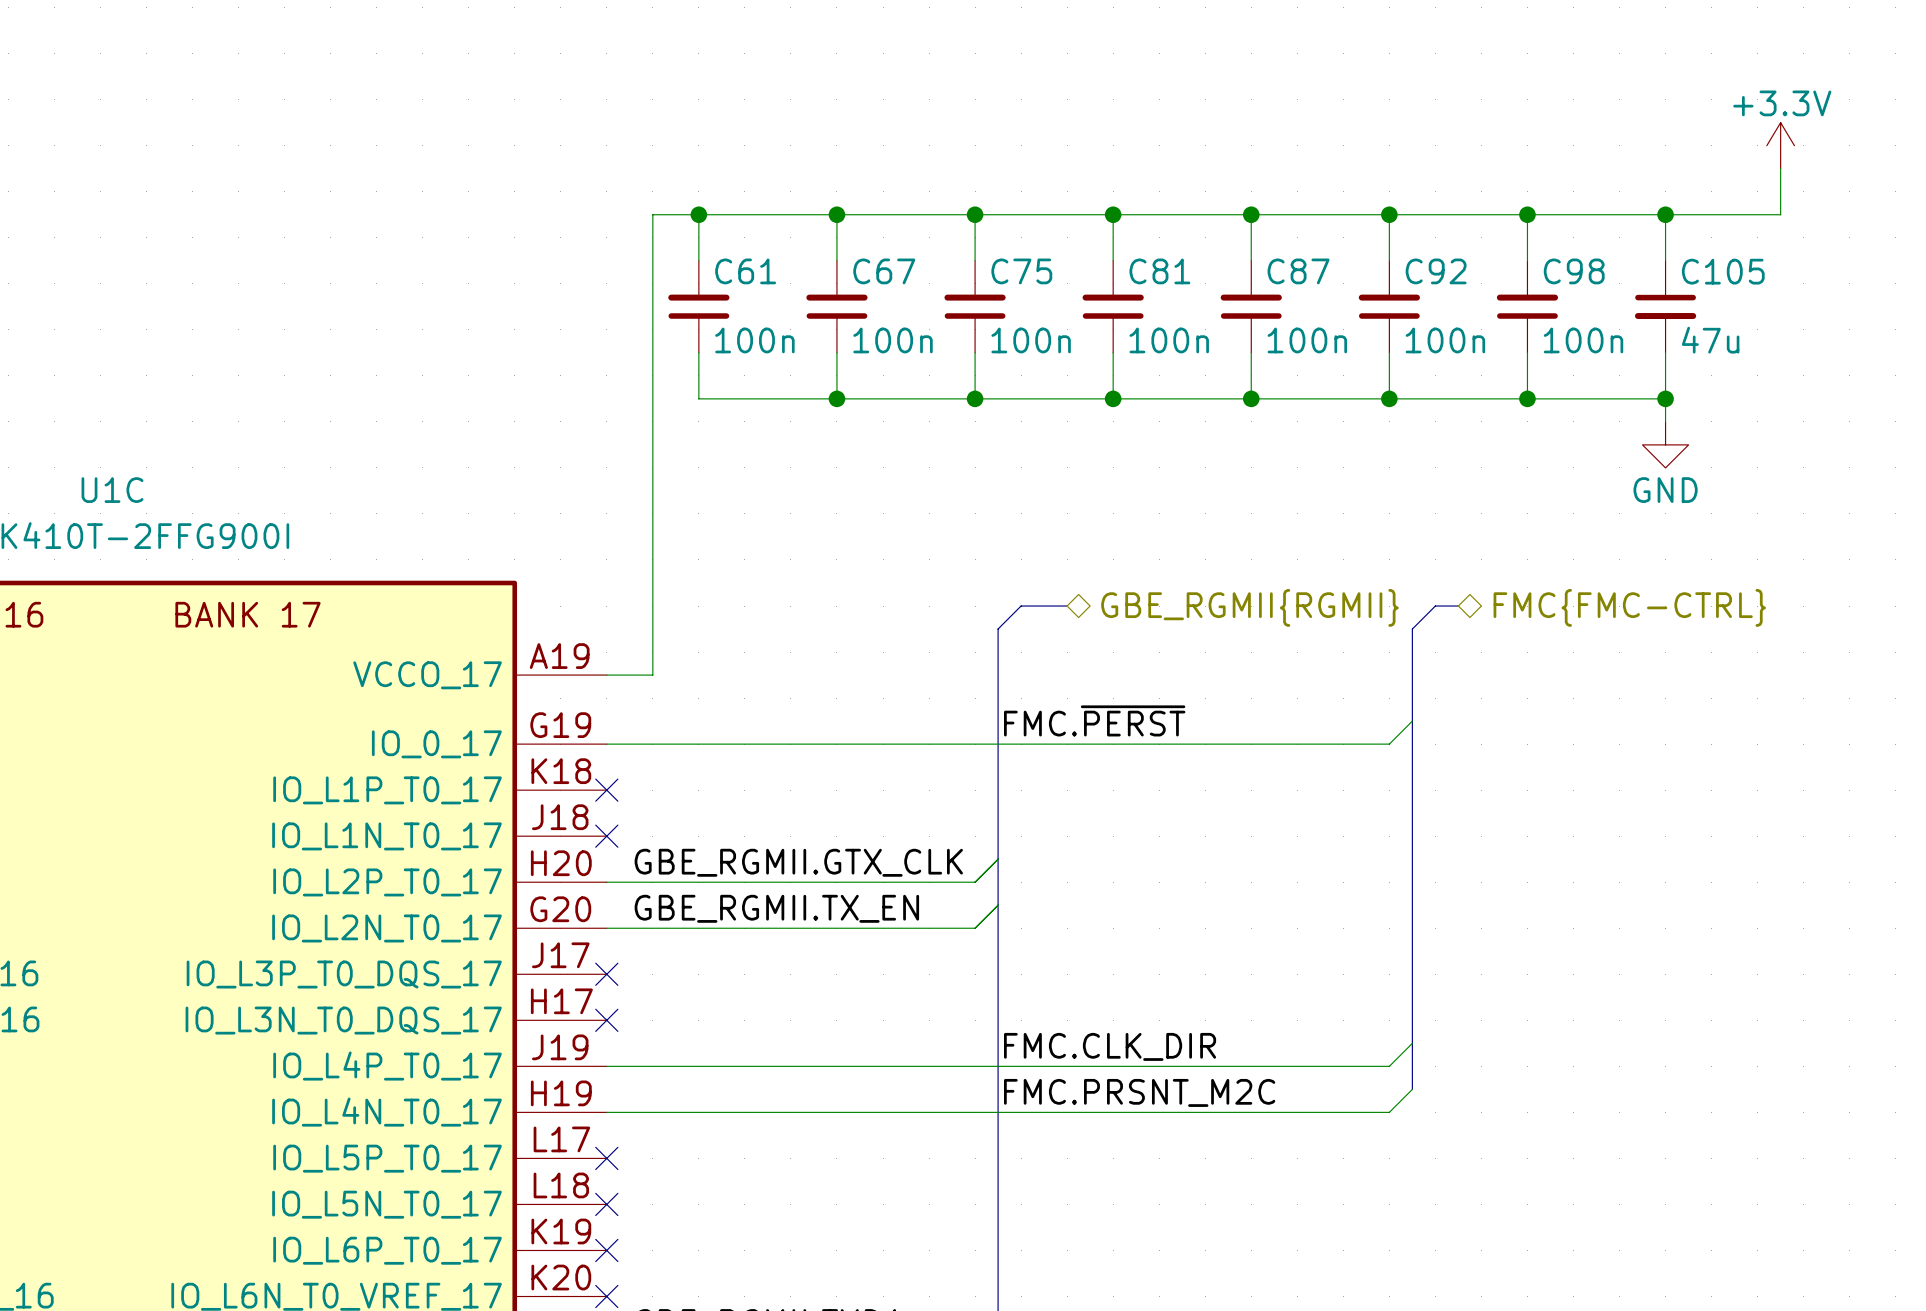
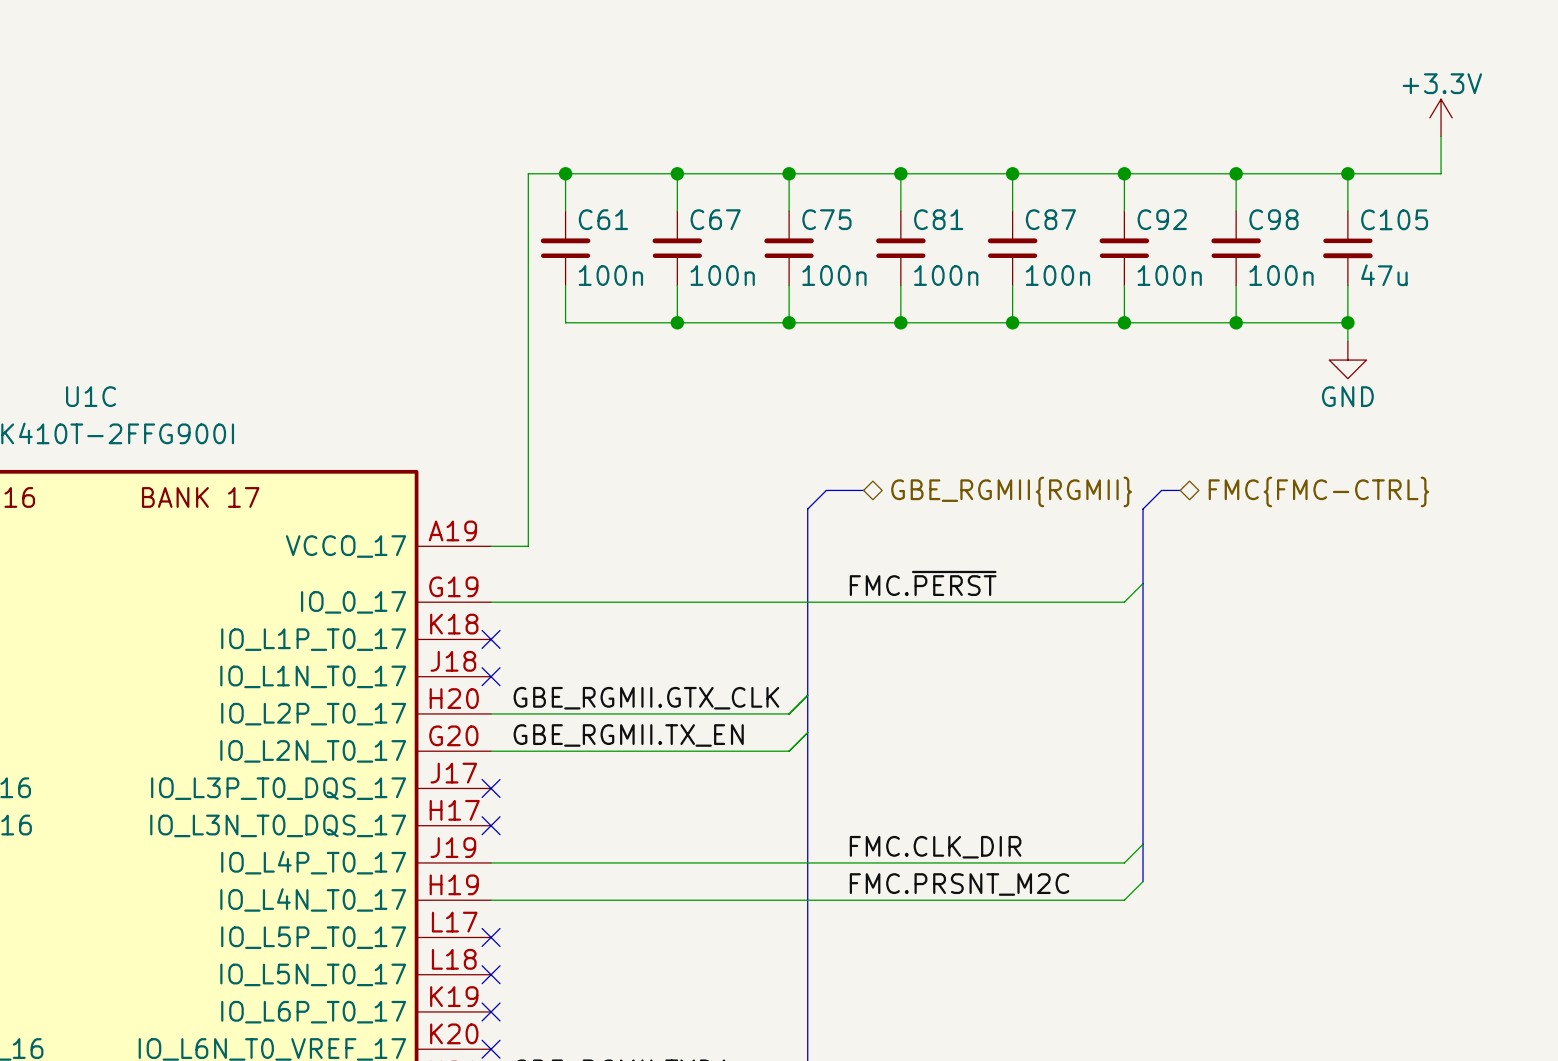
label position: FMC.~{PERST} (1094, 720) -> FMC.~{PERST} (923, 583)
label position: FMC.CLK_DIR (1110, 1046) -> FMC.CLK_DIR (935, 847)
label position: FMC.PRSNT_M2C (1139, 1092) -> FMC.PRSNT_M2C (959, 884)

